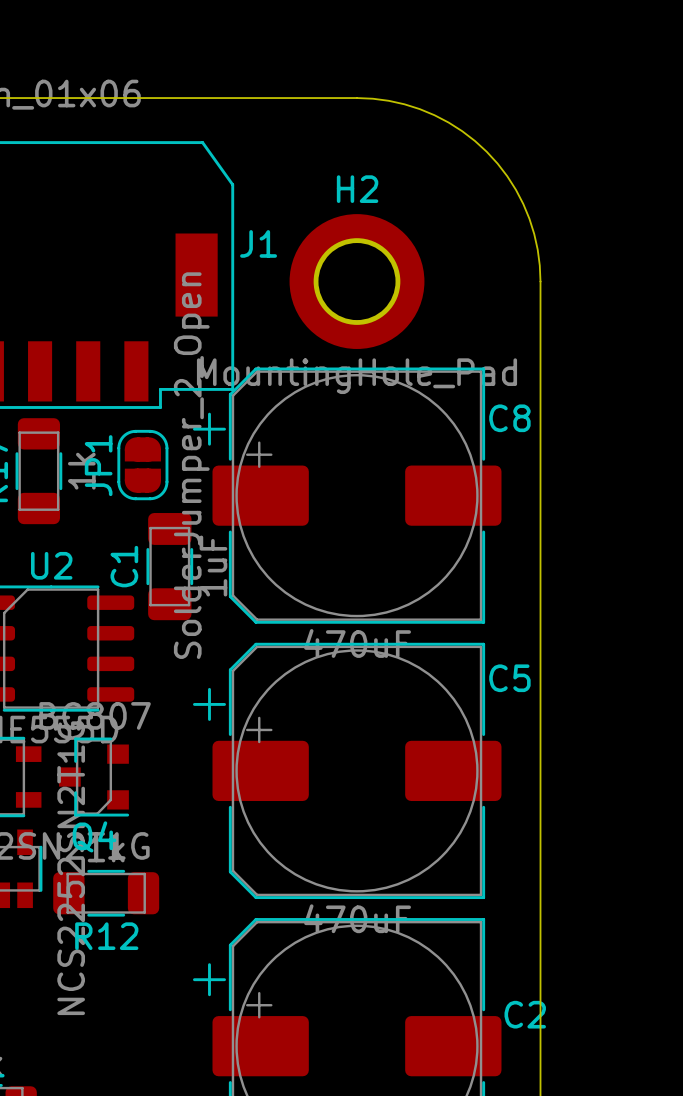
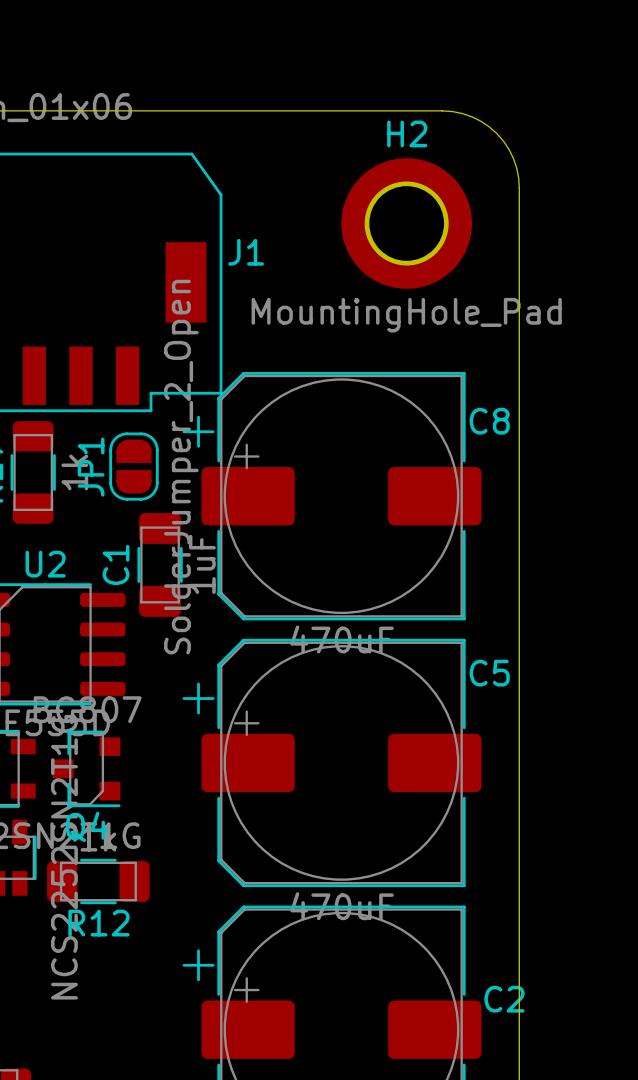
board edge: (356, 98) (388, 100) (419, 109) (462, 131) (486, 151) (507, 176) (529, 218) (537, 249) (540, 281) -> (341, 110) (452, 111) (480, 121) (496, 133) (508, 149) (518, 177) (519, 288)
H2 position: (356, 281) -> (406, 223)

